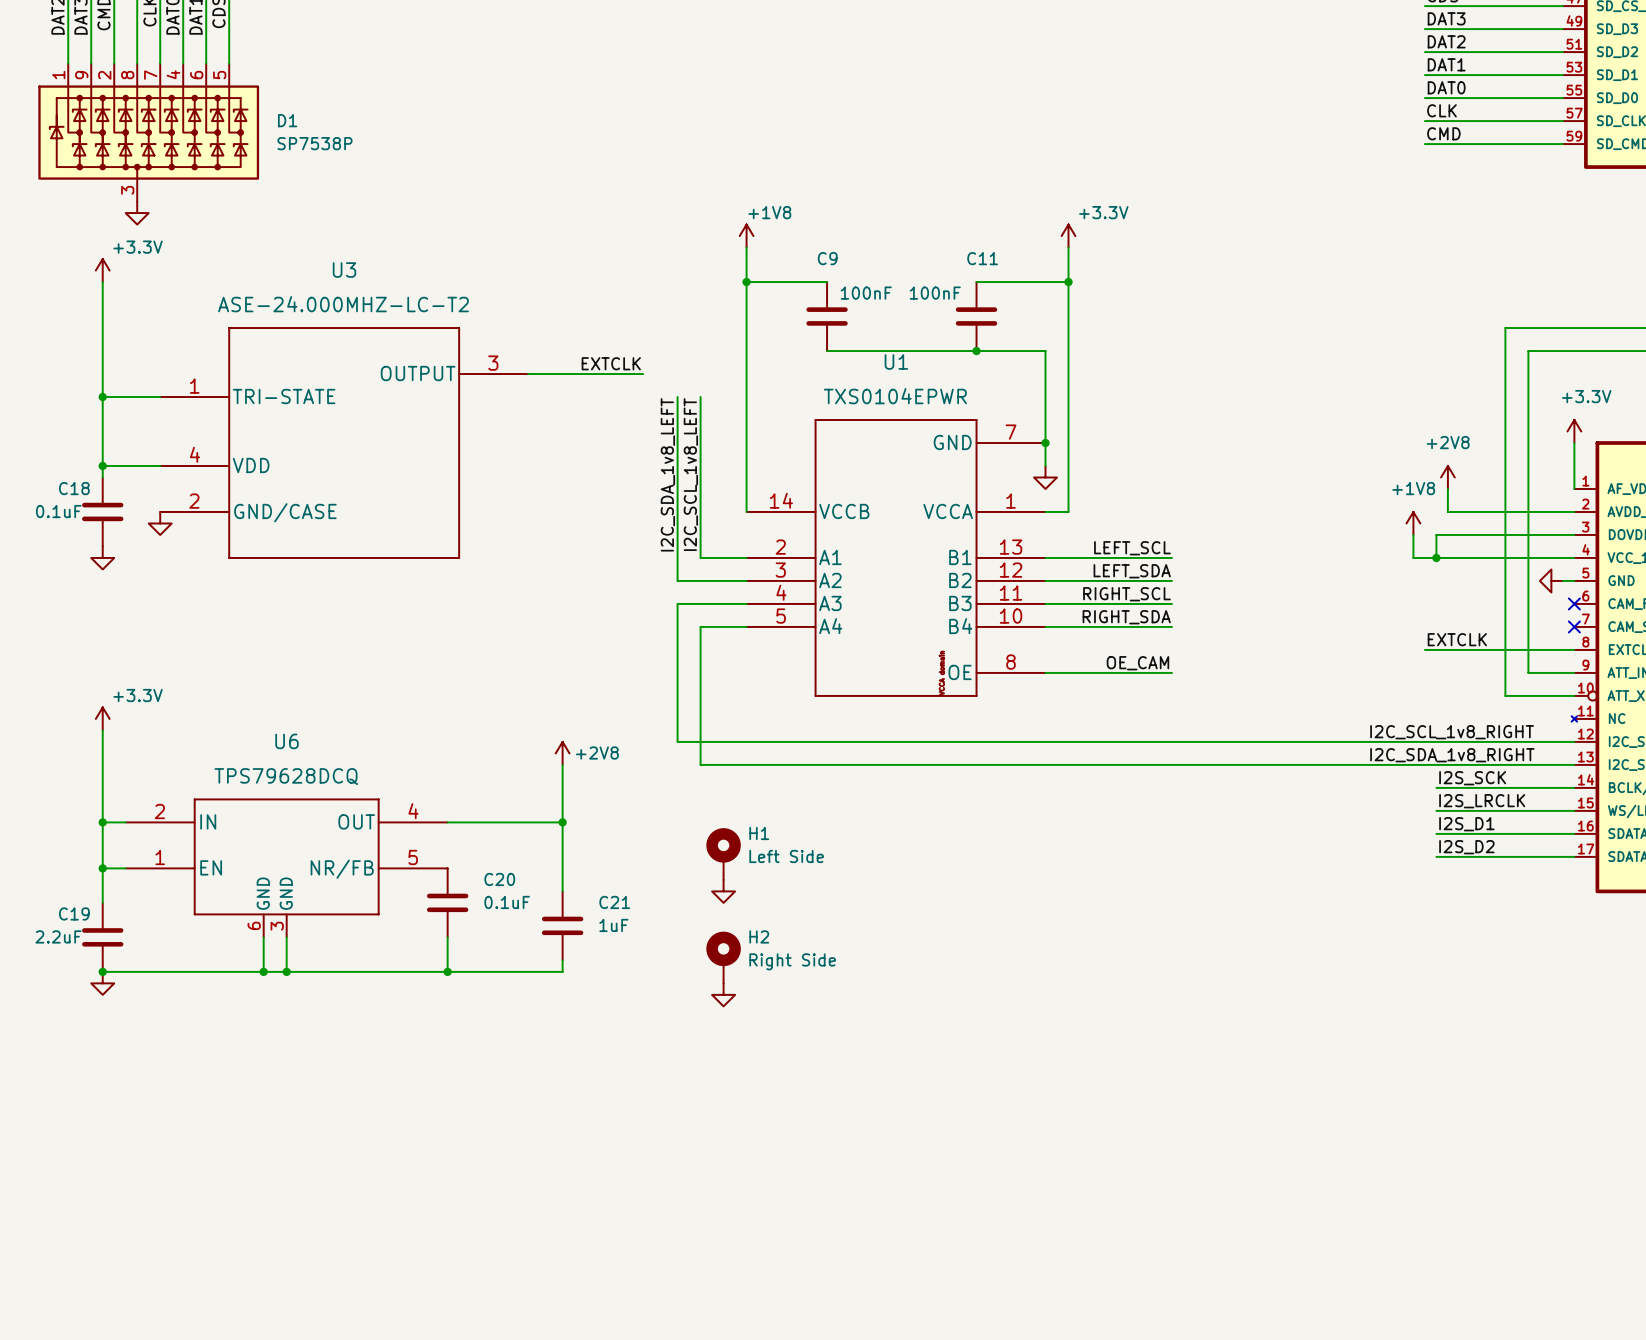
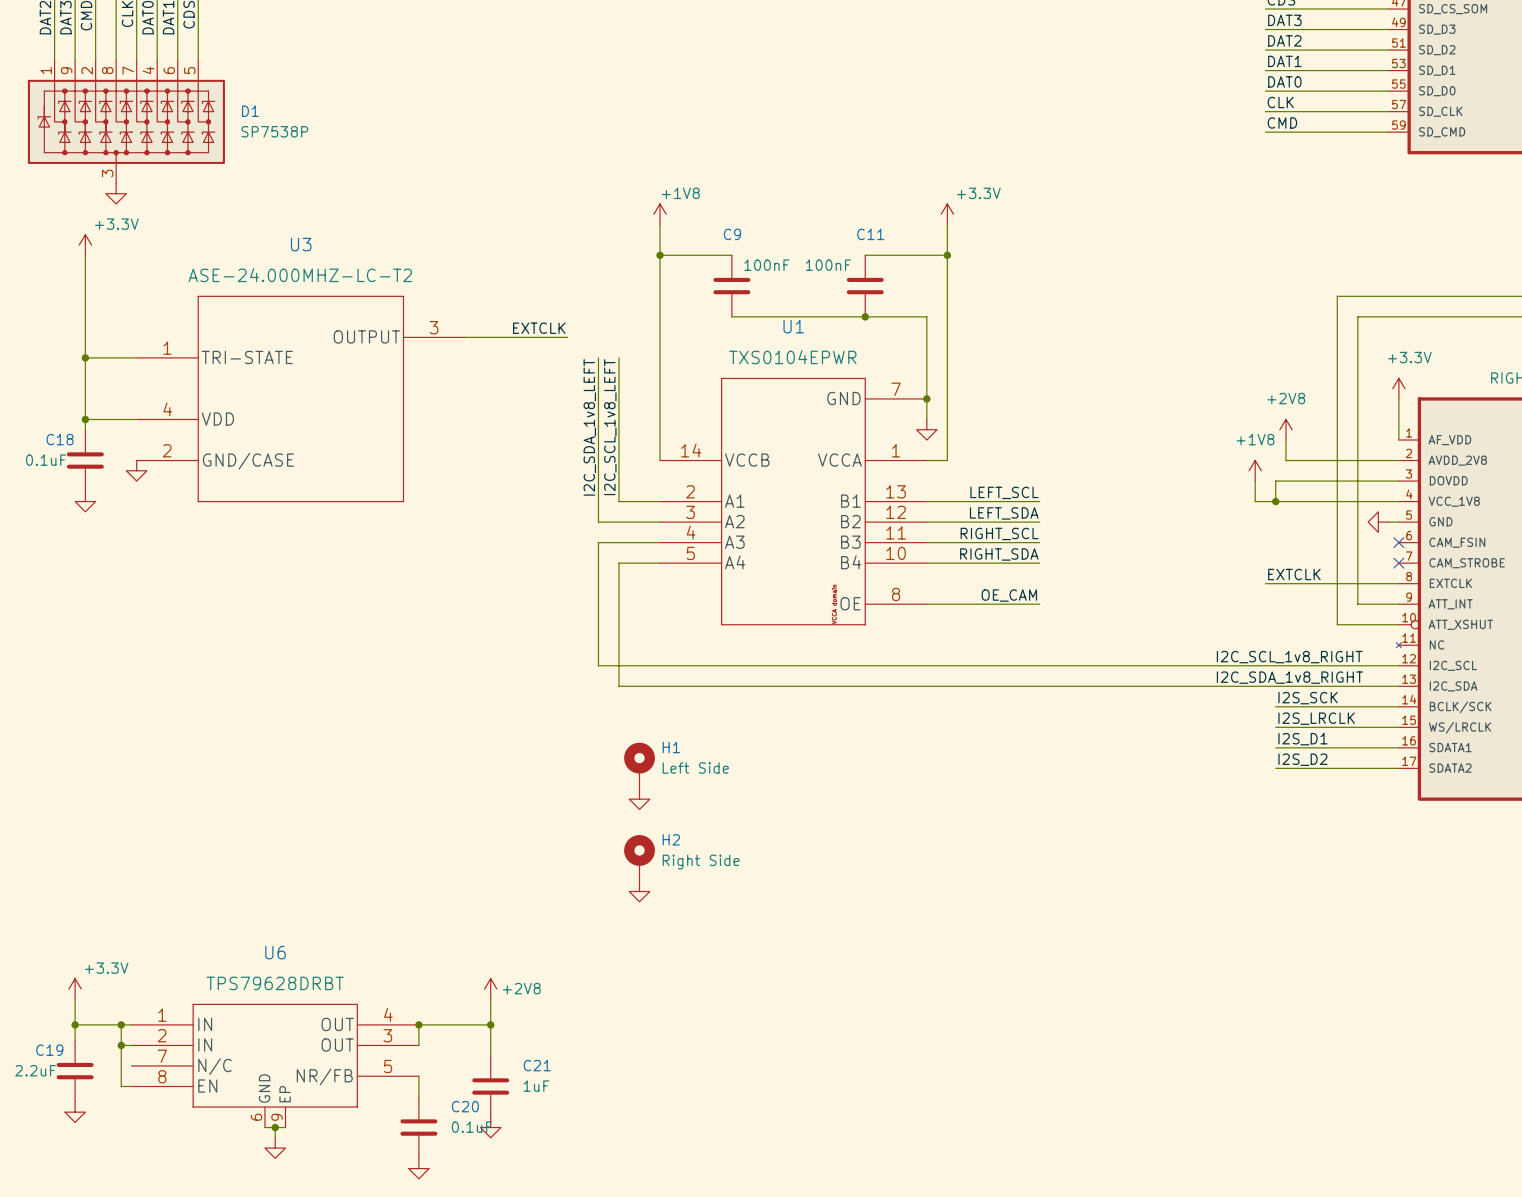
power symbol: +3.3V (102, 718) -> none
wire: (102, 730) (102, 902) -> none
power symbol: +2V8 (562, 753) -> none
wire: (562, 764) (562, 891) -> none
U6 value: TPS79628DCQ (286, 776) -> TPS79628DRBT (275, 983)
U6 symbol: [125, 798, 448, 938] -> [131, 1003, 419, 1128]
wire: (102, 822) (125, 822) -> none
junction: (102, 822) -> none
wire: (447, 822) (562, 822) -> none
junction: (562, 822) -> none
wire: (102, 868) (125, 868) -> none
junction: (102, 868) -> none
C20 position: (447, 902) -> (418, 1127)
C21 position: (562, 925) -> (490, 1086)
C19 position: (102, 937) -> (75, 1071)
wire: (263, 937) (263, 971) -> none
wire: (286, 937) (286, 971) -> none
wire: (447, 937) (447, 971) -> none
wire: (562, 960) (562, 971) (102, 971) -> none
junction: (102, 971) -> none
junction: (263, 971) -> none
junction: (286, 971) -> none
junction: (447, 971) -> none
power symbol: (102, 983) -> none
power symbol: none -> +3.3V (75, 989)
power symbol: none -> +2V8 (490, 989)
wire: none -> (75, 999) (75, 1040)
wire: none -> (490, 999) (490, 1055)
wire: none -> (75, 1024) (131, 1024)
junction: none -> (75, 1024)
wire: none -> (121, 1024) (121, 1086) (131, 1086)
junction: none -> (121, 1024)
junction: none -> (418, 1024)
wire: none -> (490, 1024) (418, 1024) (418, 1045)
junction: none -> (490, 1024)
wire: none -> (121, 1045) (131, 1045)
junction: none -> (121, 1045)
wire: none -> (418, 1076) (418, 1096)
power symbol: none -> (75, 1112)
wire: none -> (264, 1127) (285, 1127)
wire: none -> (275, 1127) (275, 1137)
junction: none -> (275, 1127)
power symbol: none -> (490, 1127)
power symbol: none -> (275, 1148)
power symbol: none -> (418, 1168)

